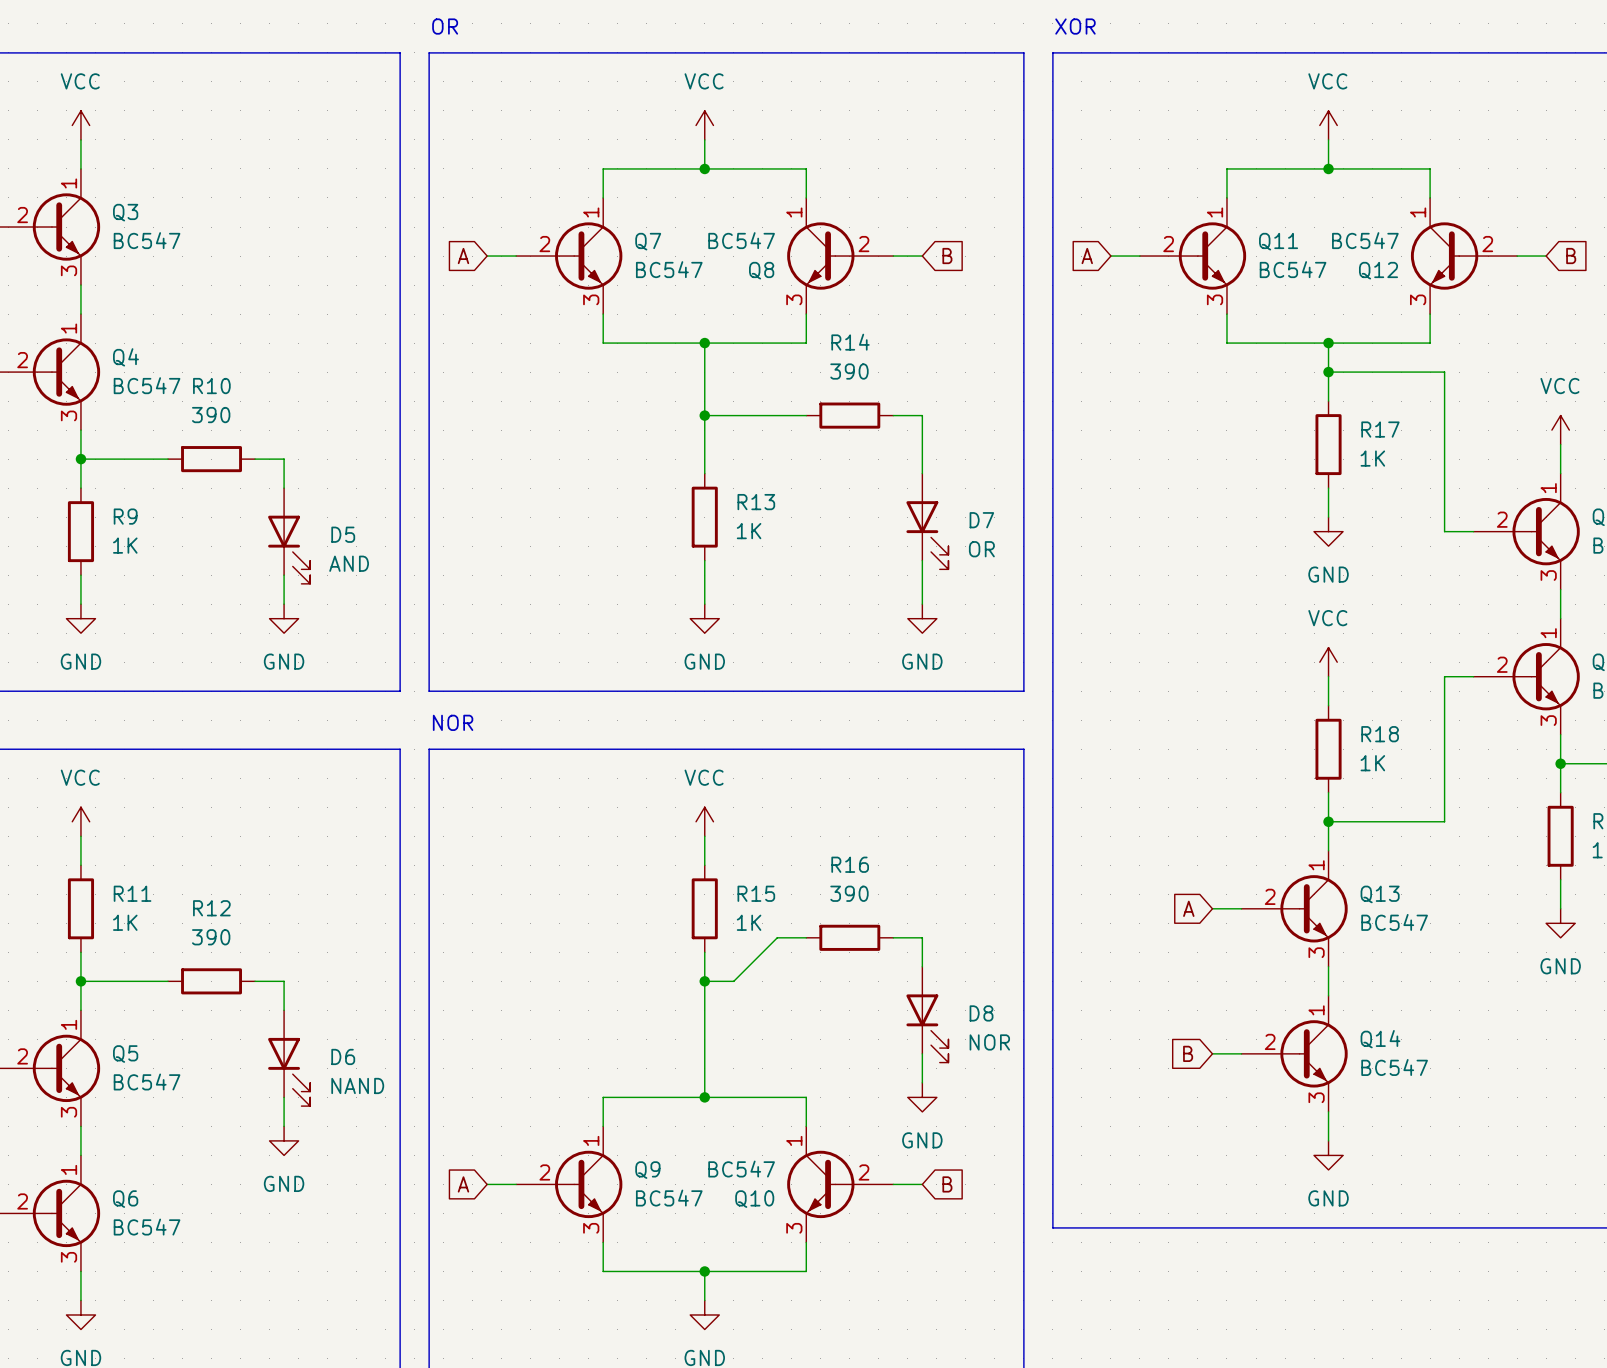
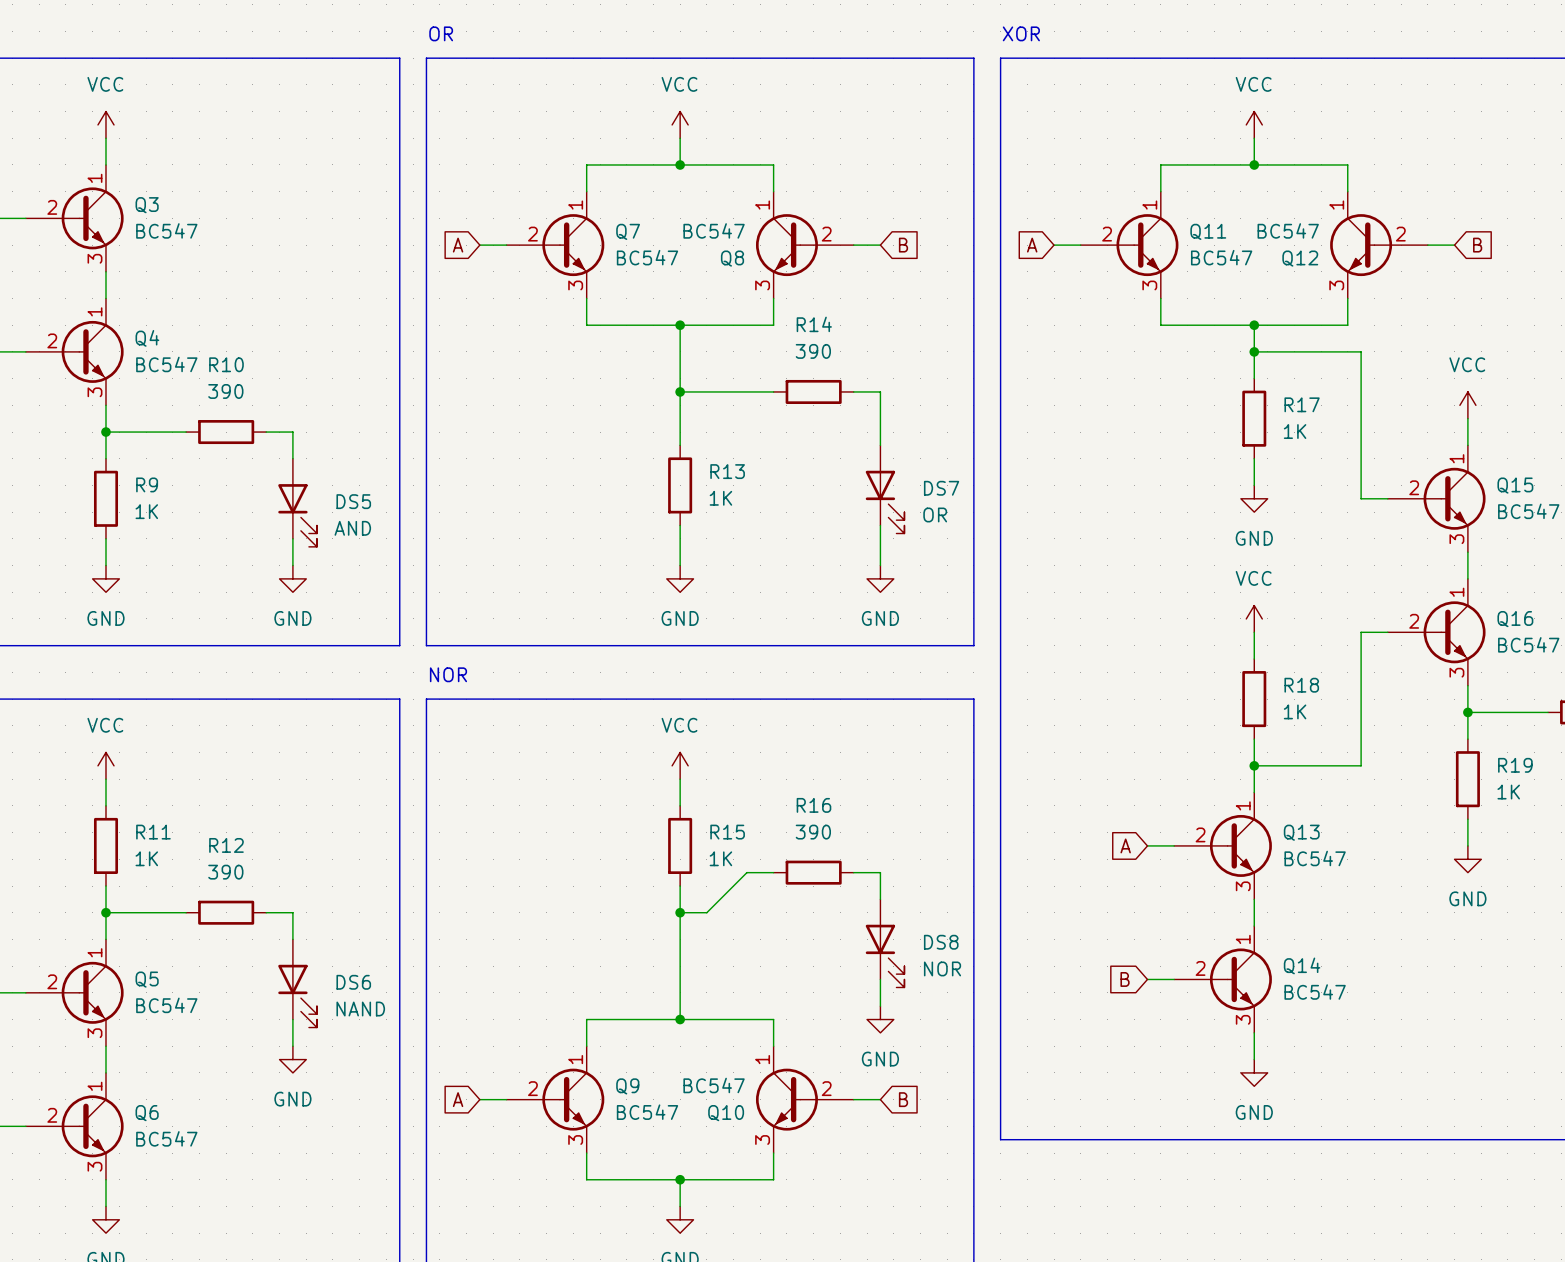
D7 name: D7 (981, 520) -> DS7 (941, 488)
D5 name: D5 (343, 534) -> DS5 (353, 501)
D8 name: D8 (981, 1013) -> DS8 (941, 942)
D6 name: D6 (343, 1056) -> DS6 (353, 982)

